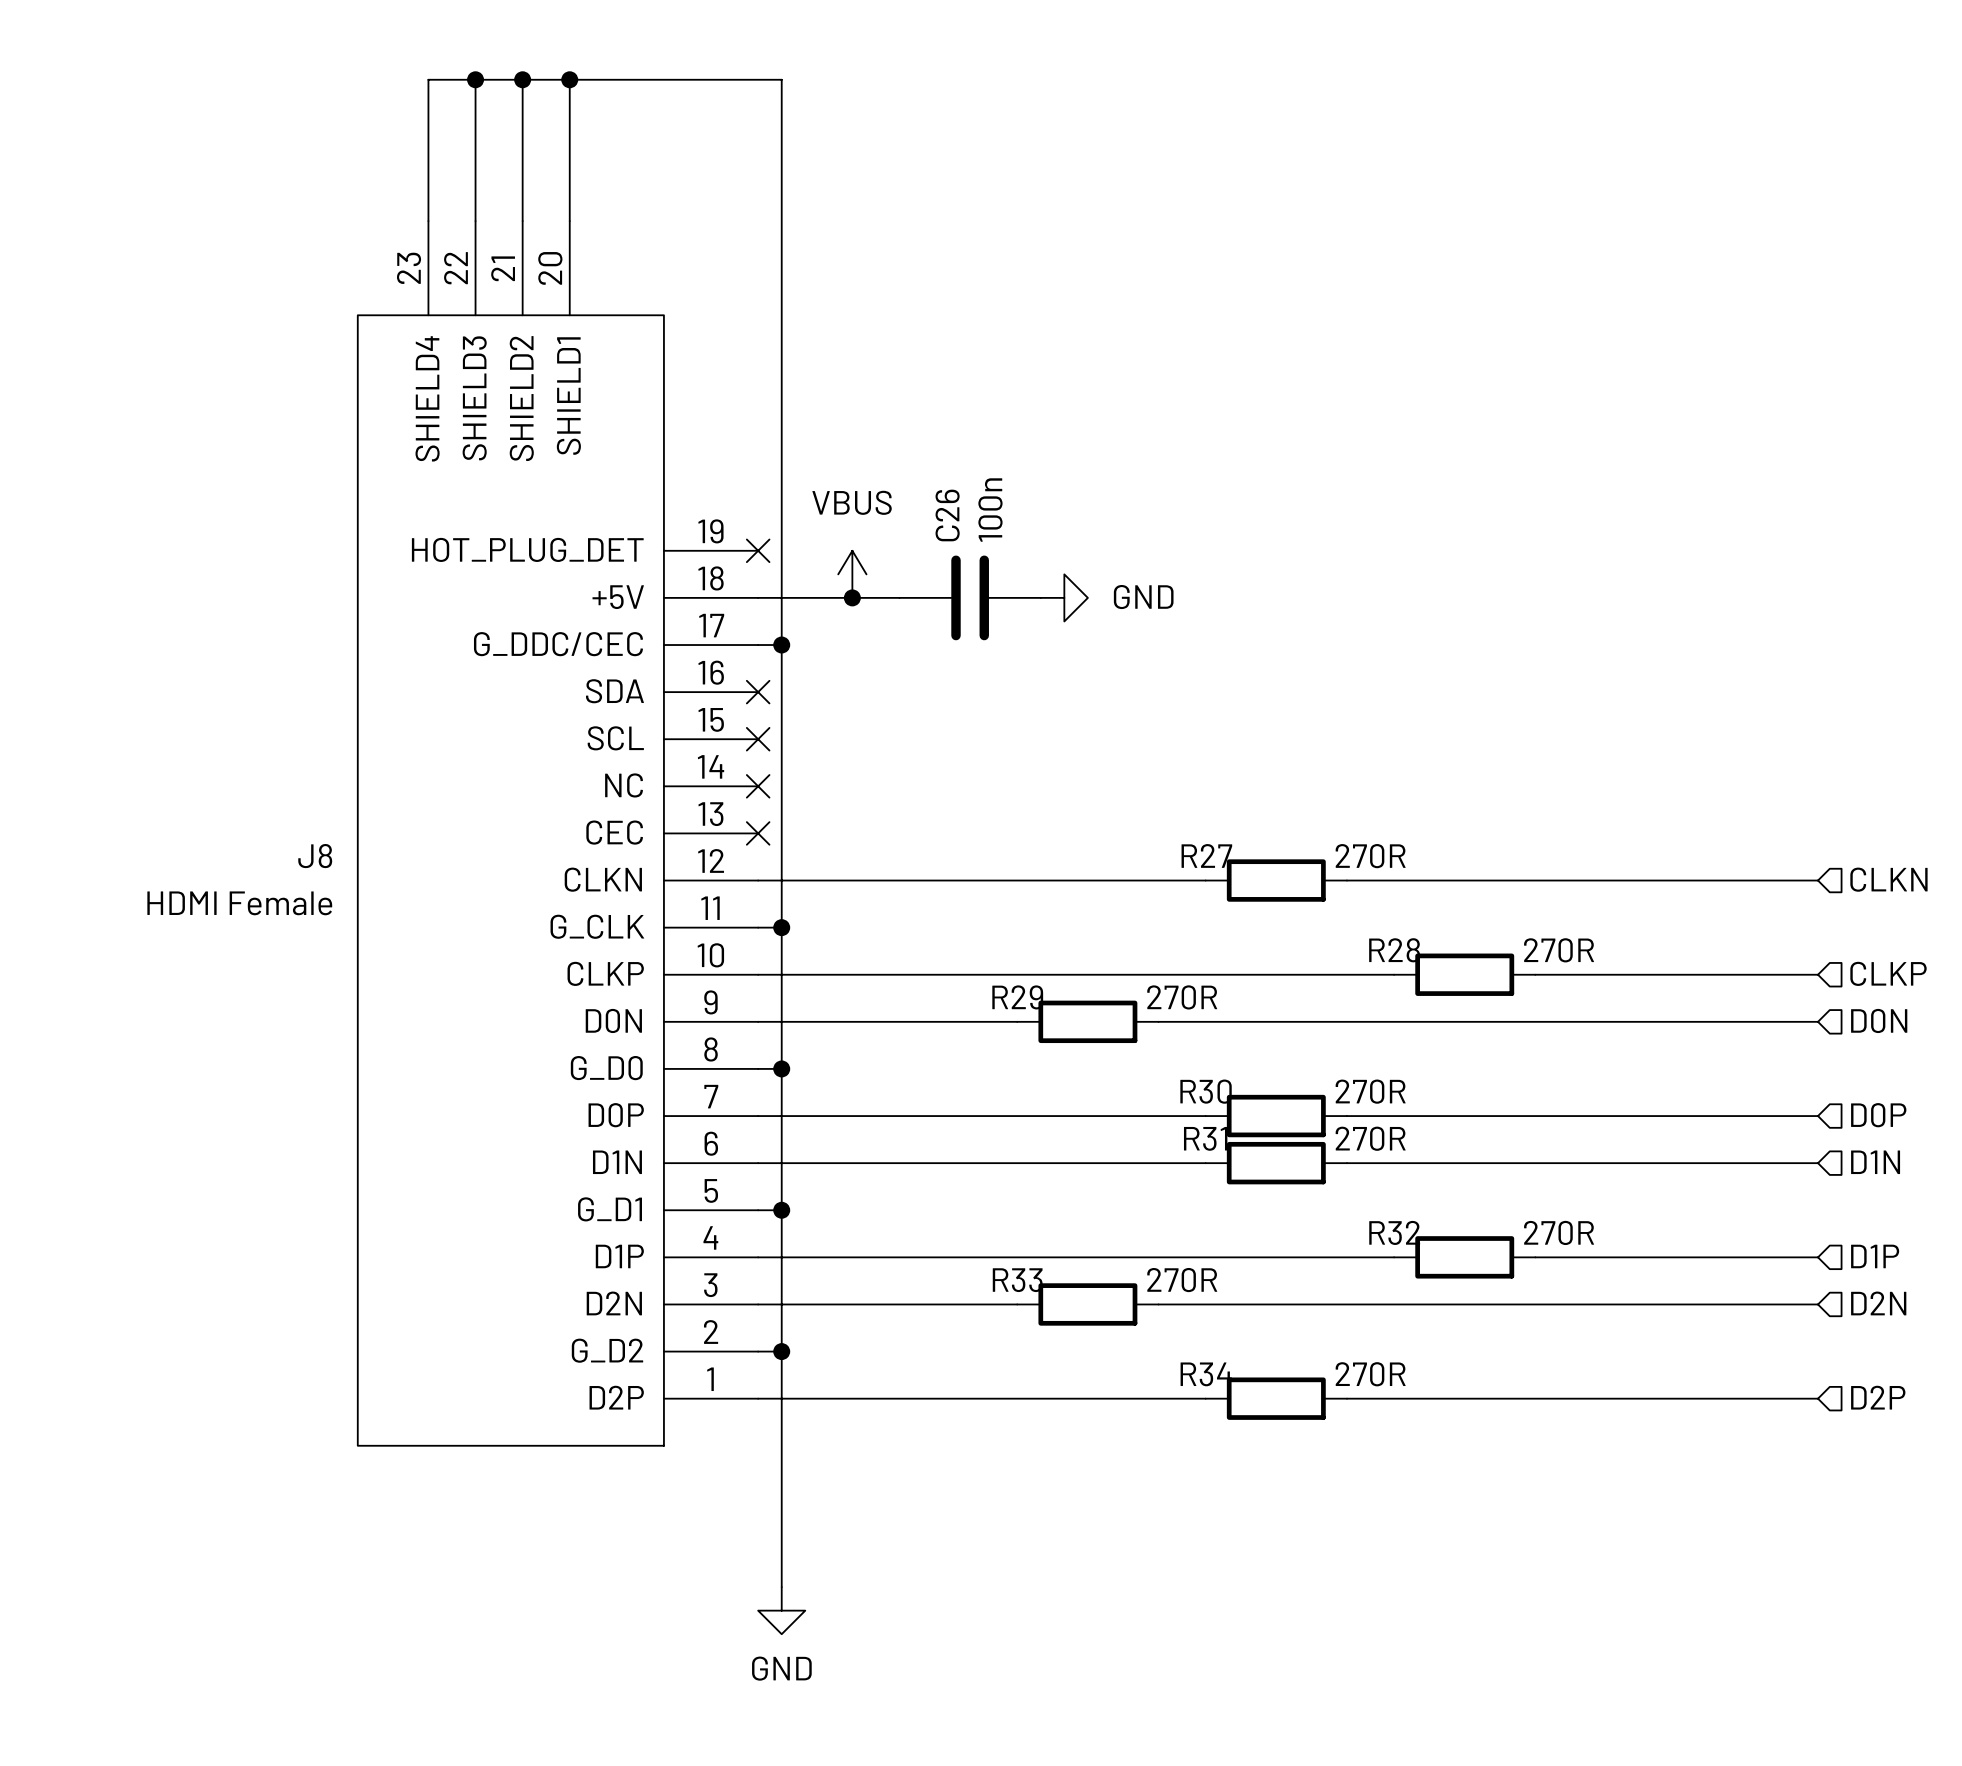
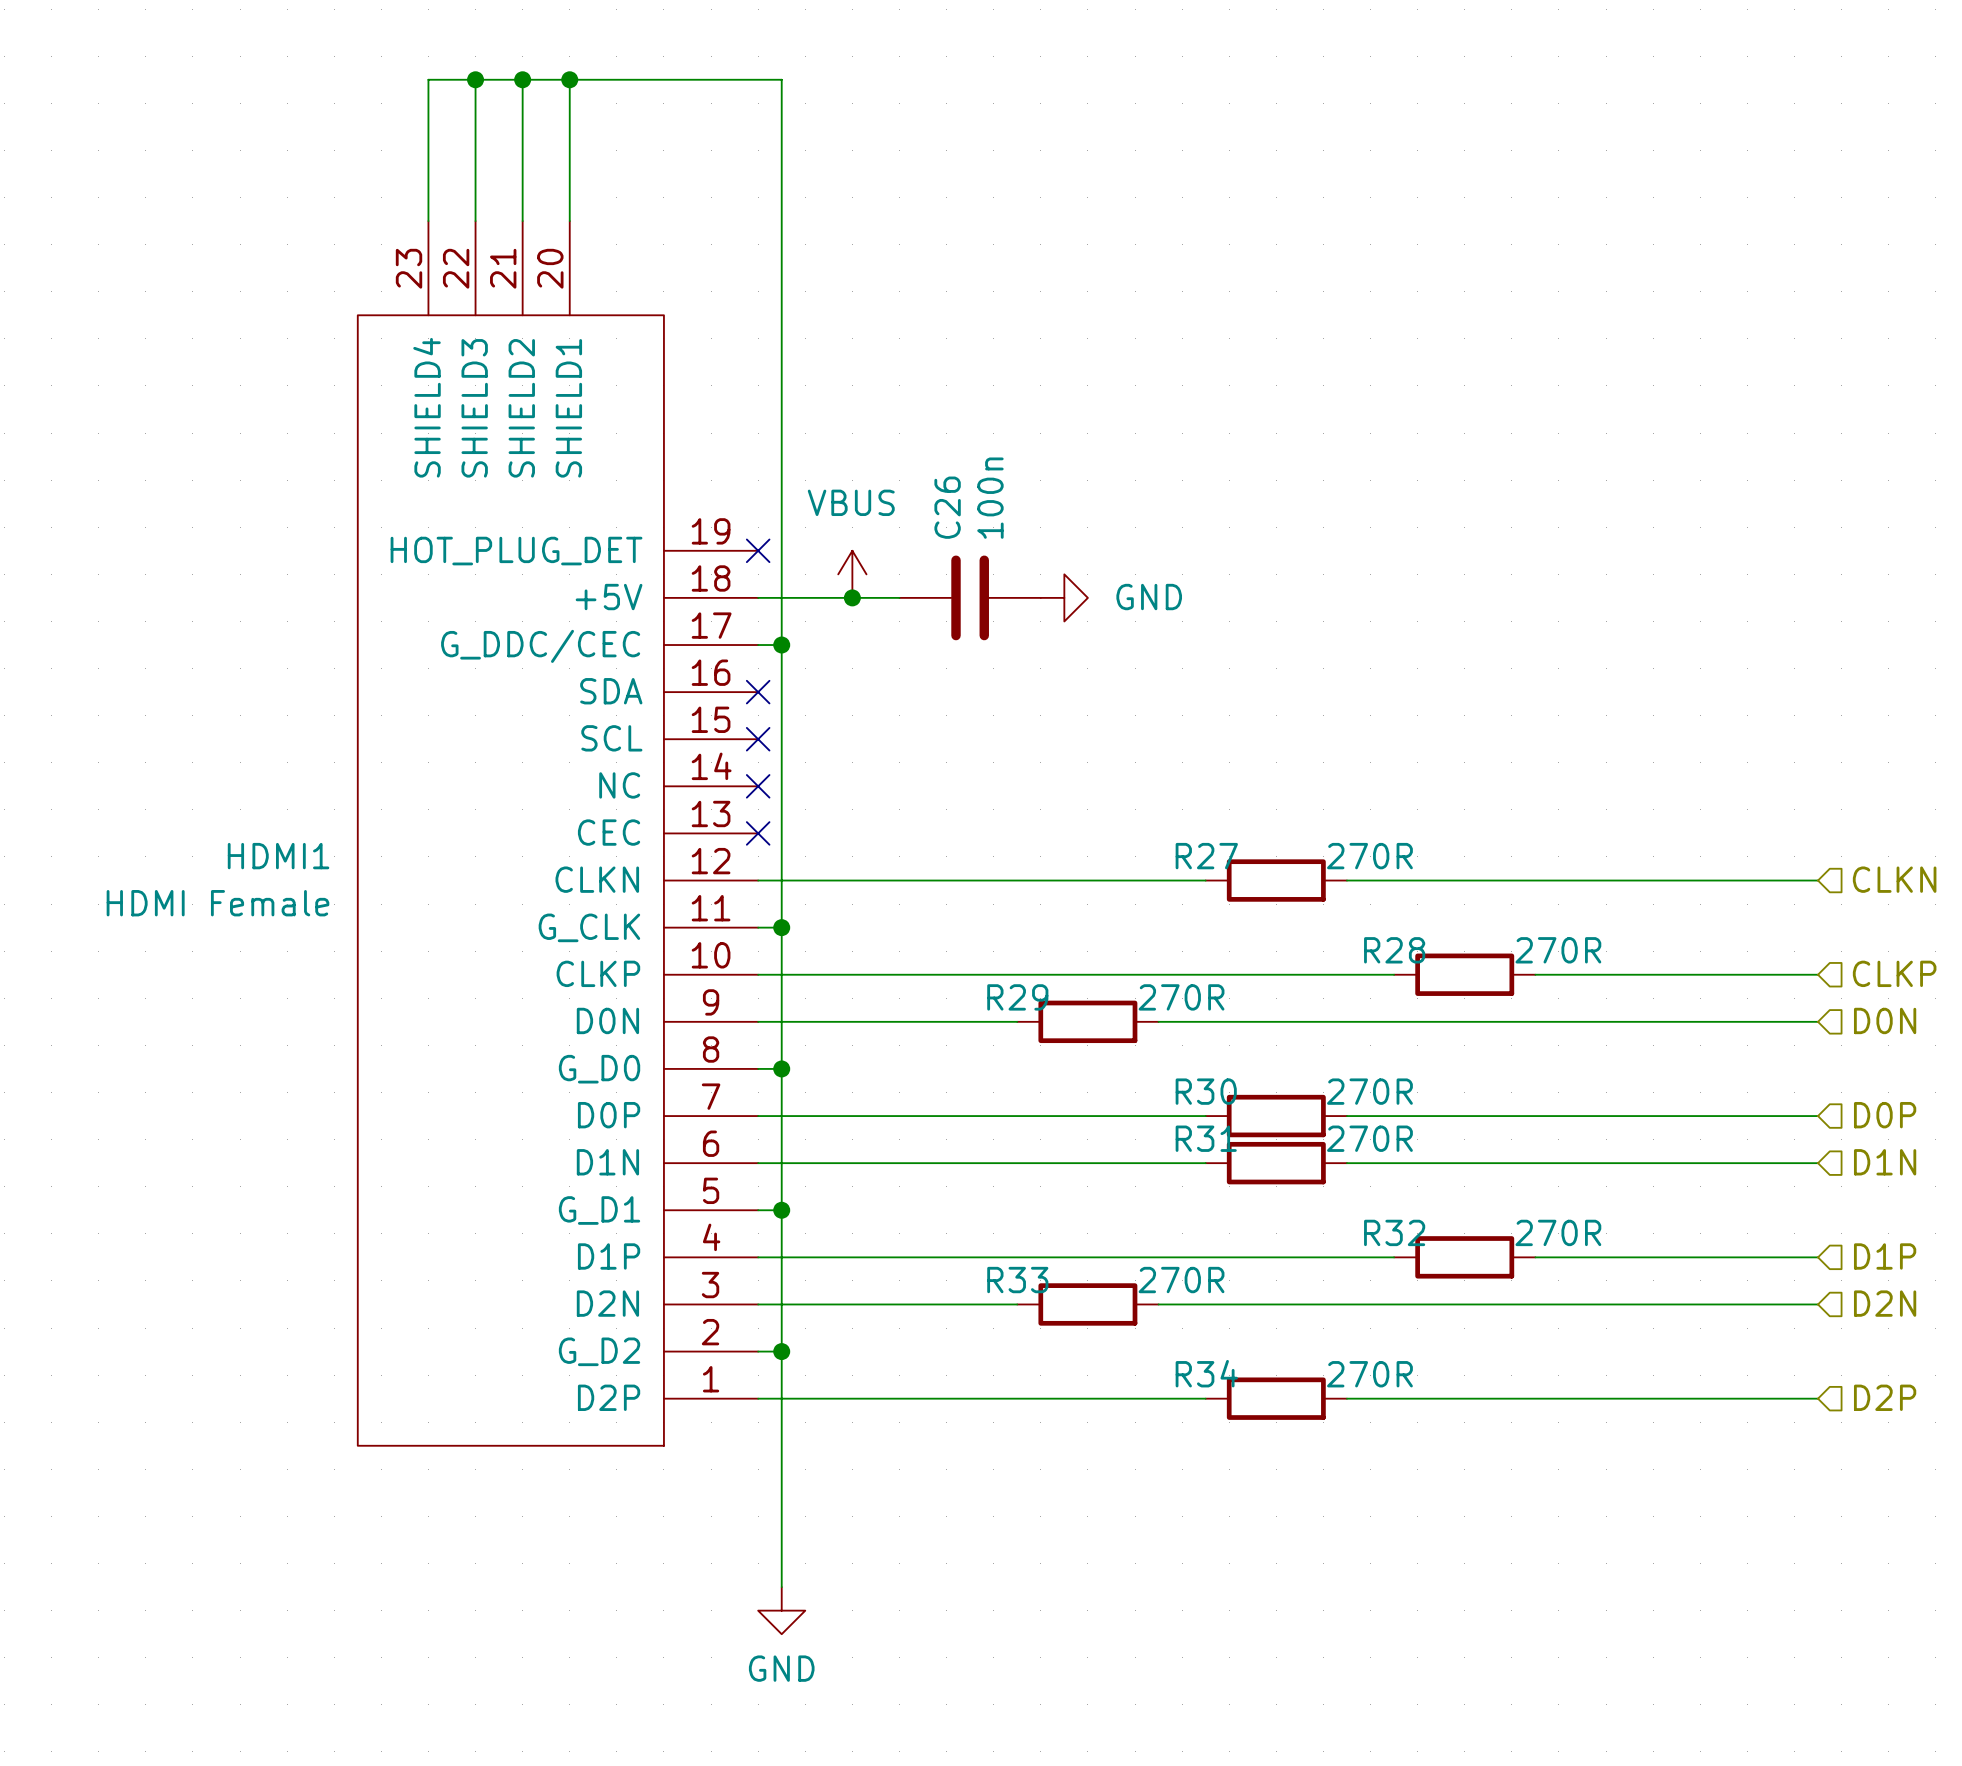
J8 name: J8 (315, 856) -> HDMI1 (278, 856)

